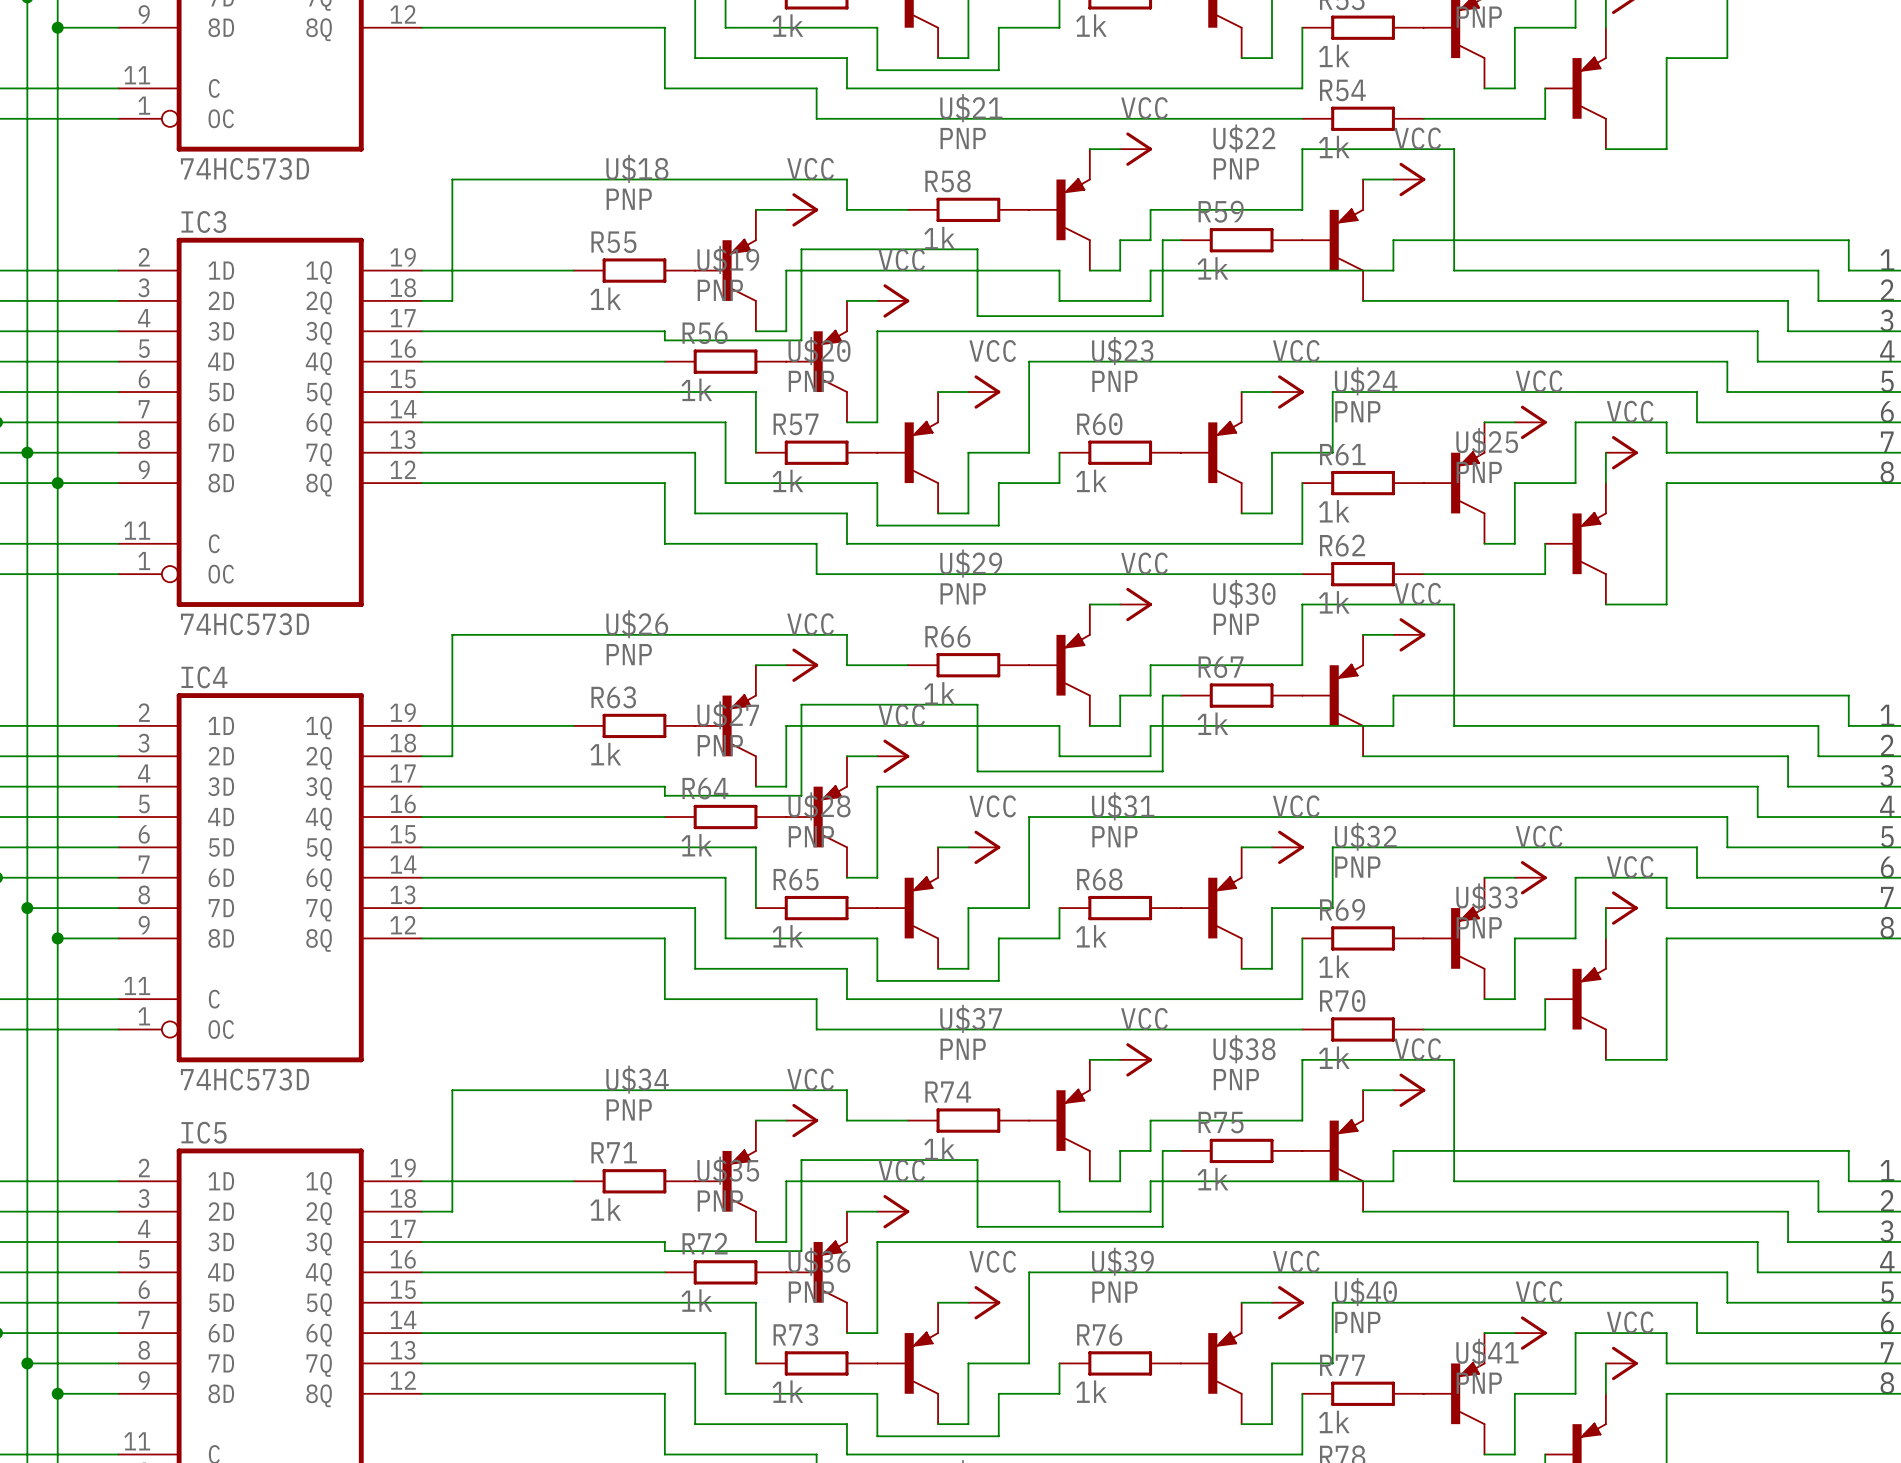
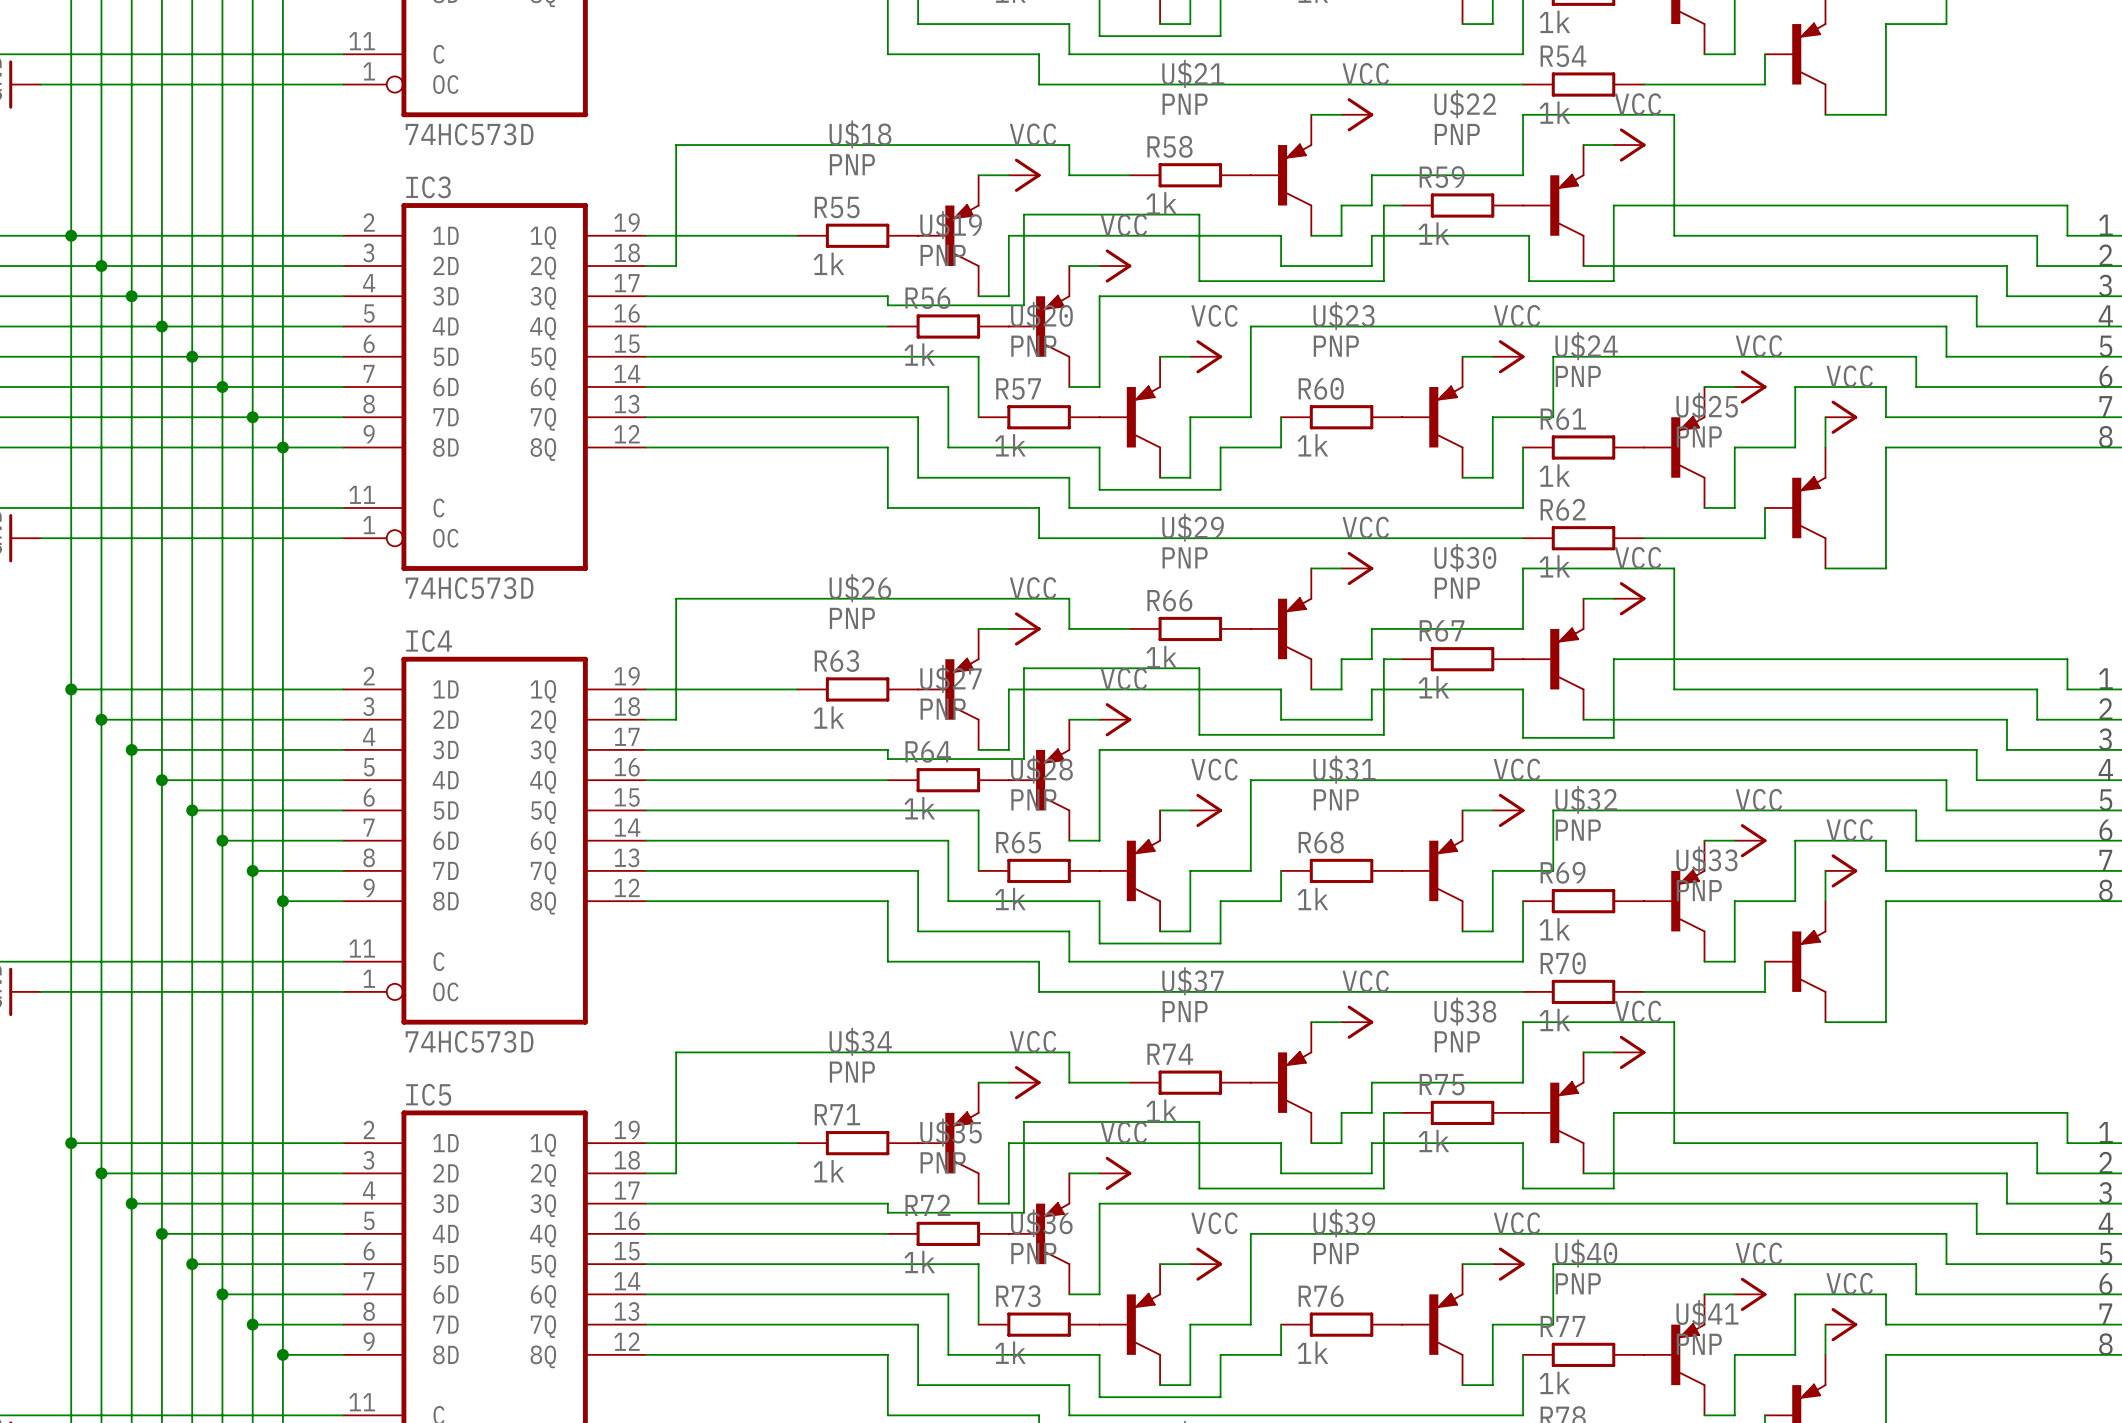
wire: (1308, 270) (1393, 270) -> (1529, 235) (1529, 281) (1613, 281) (1613, 235)
wire: (1302, 725) (1393, 725) -> (1523, 689) (1523, 737) (1613, 737) (1613, 689)
wire: (1302, 1181) (1393, 1181) -> (1523, 1143) (1523, 1188) (1613, 1188) (1613, 1143)

